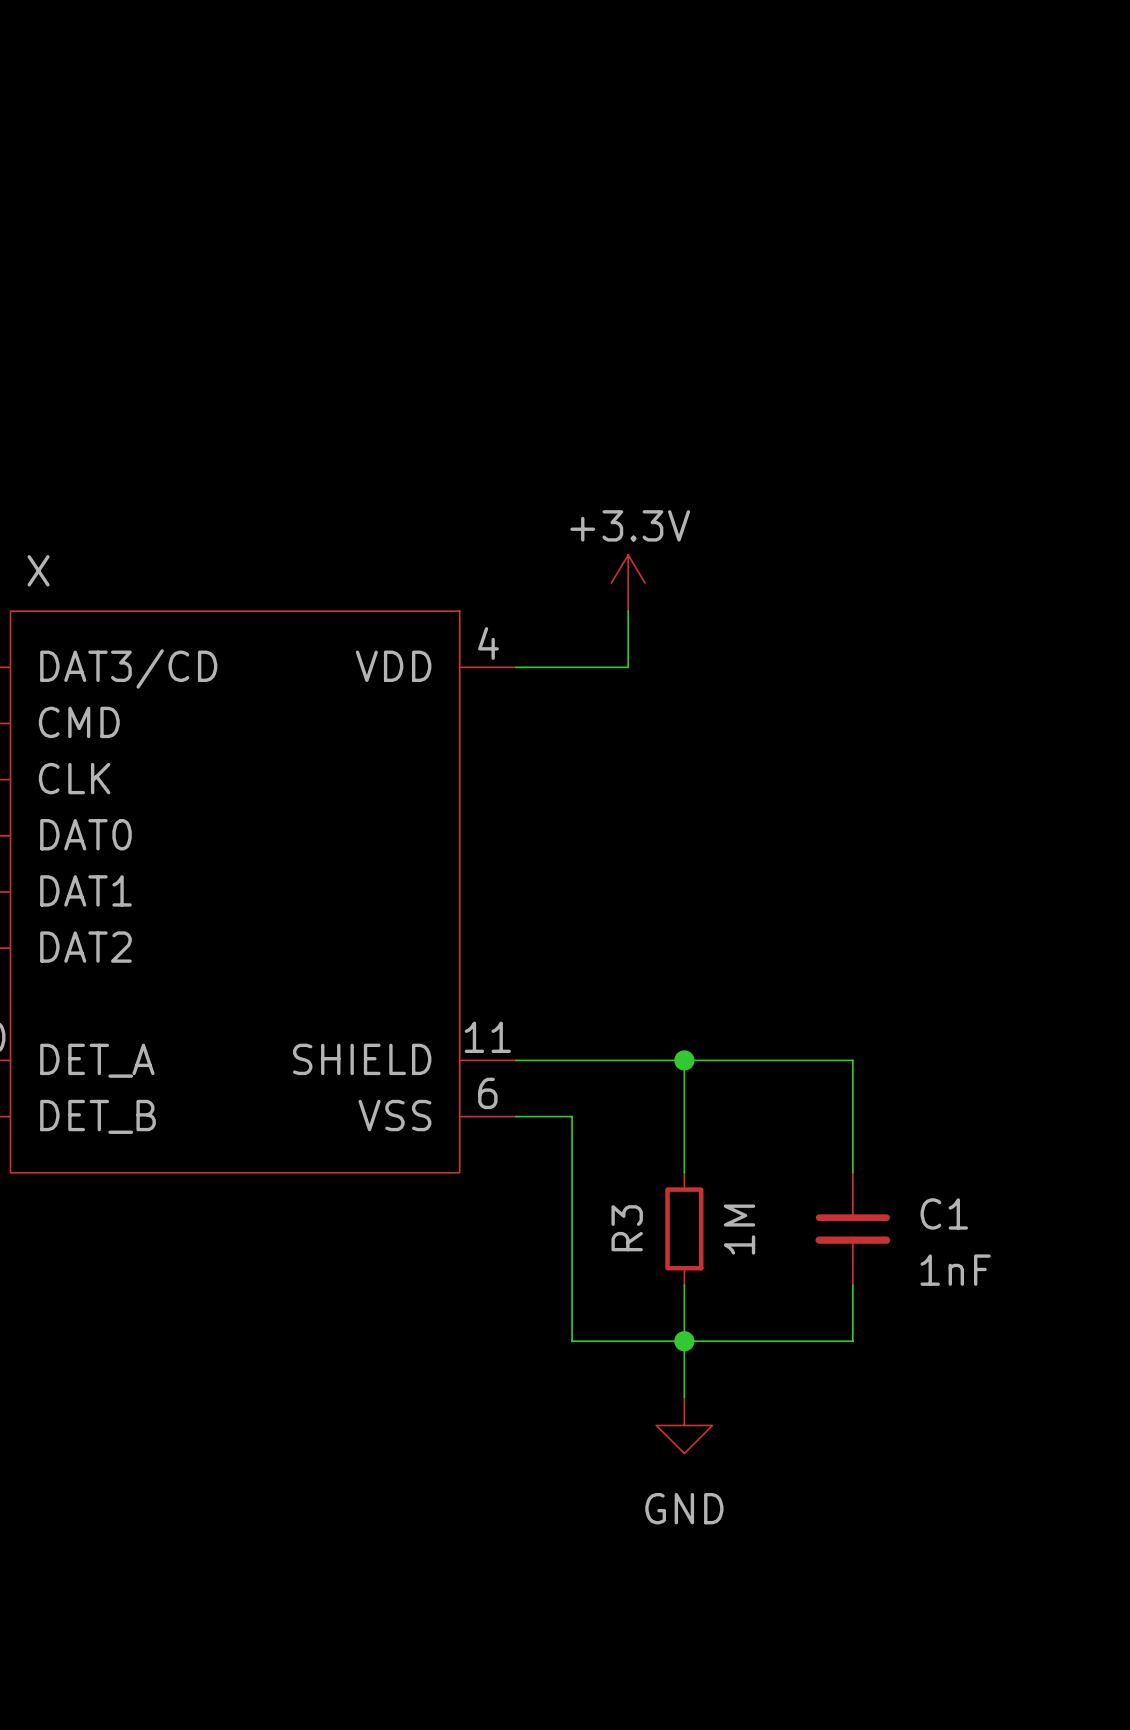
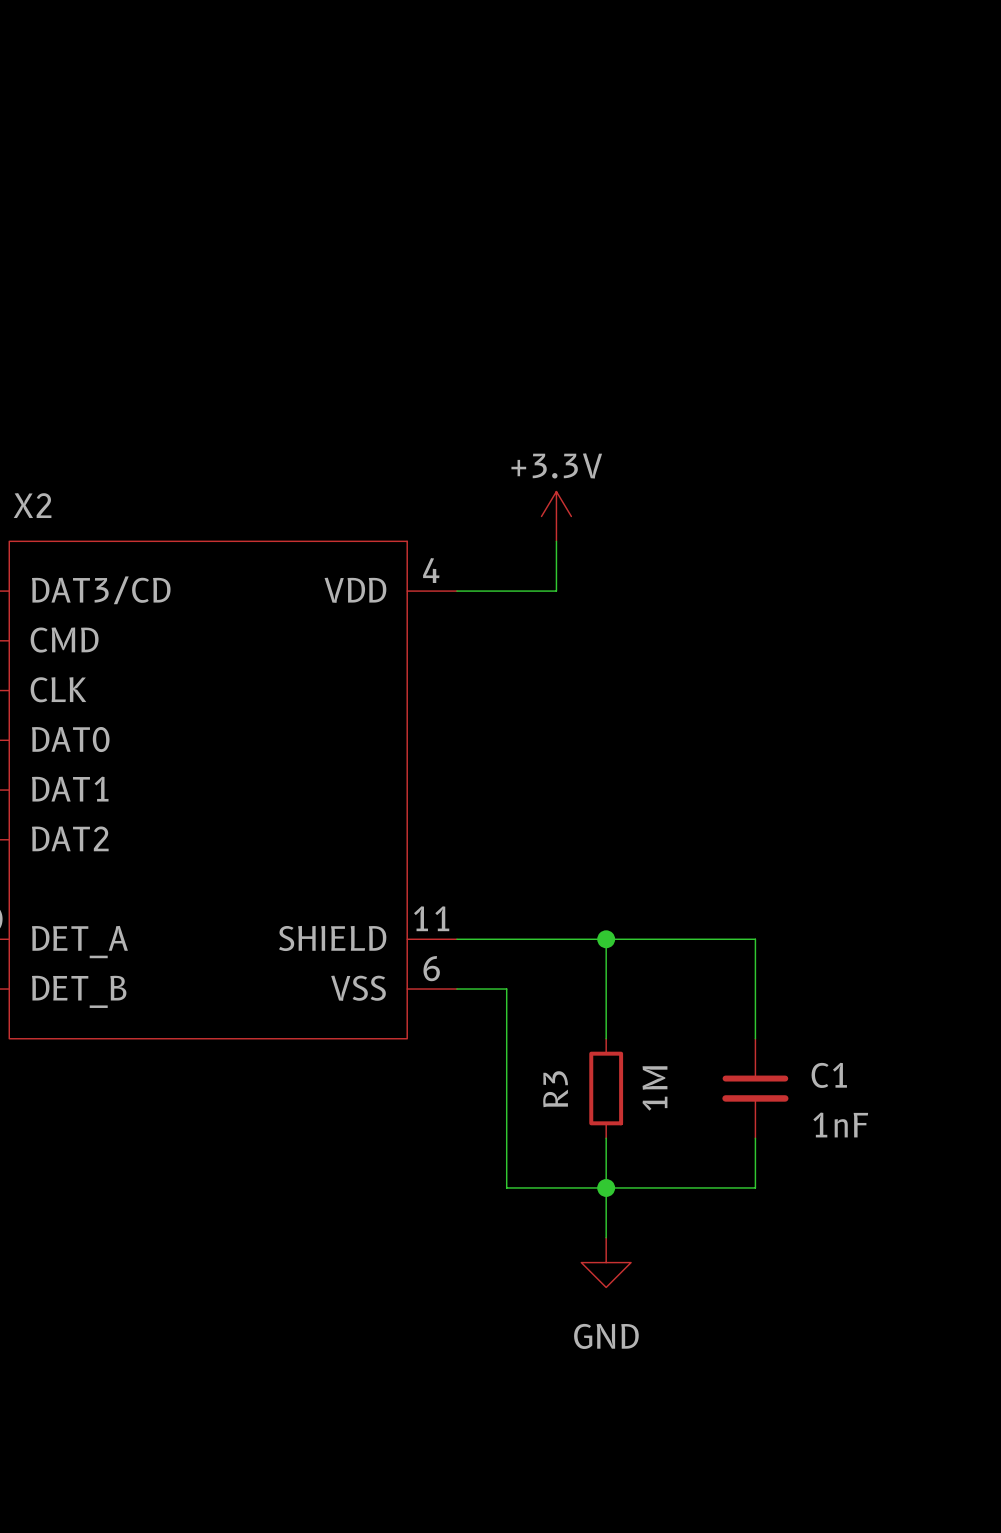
X name: X (38, 570) -> X2 (32, 505)

